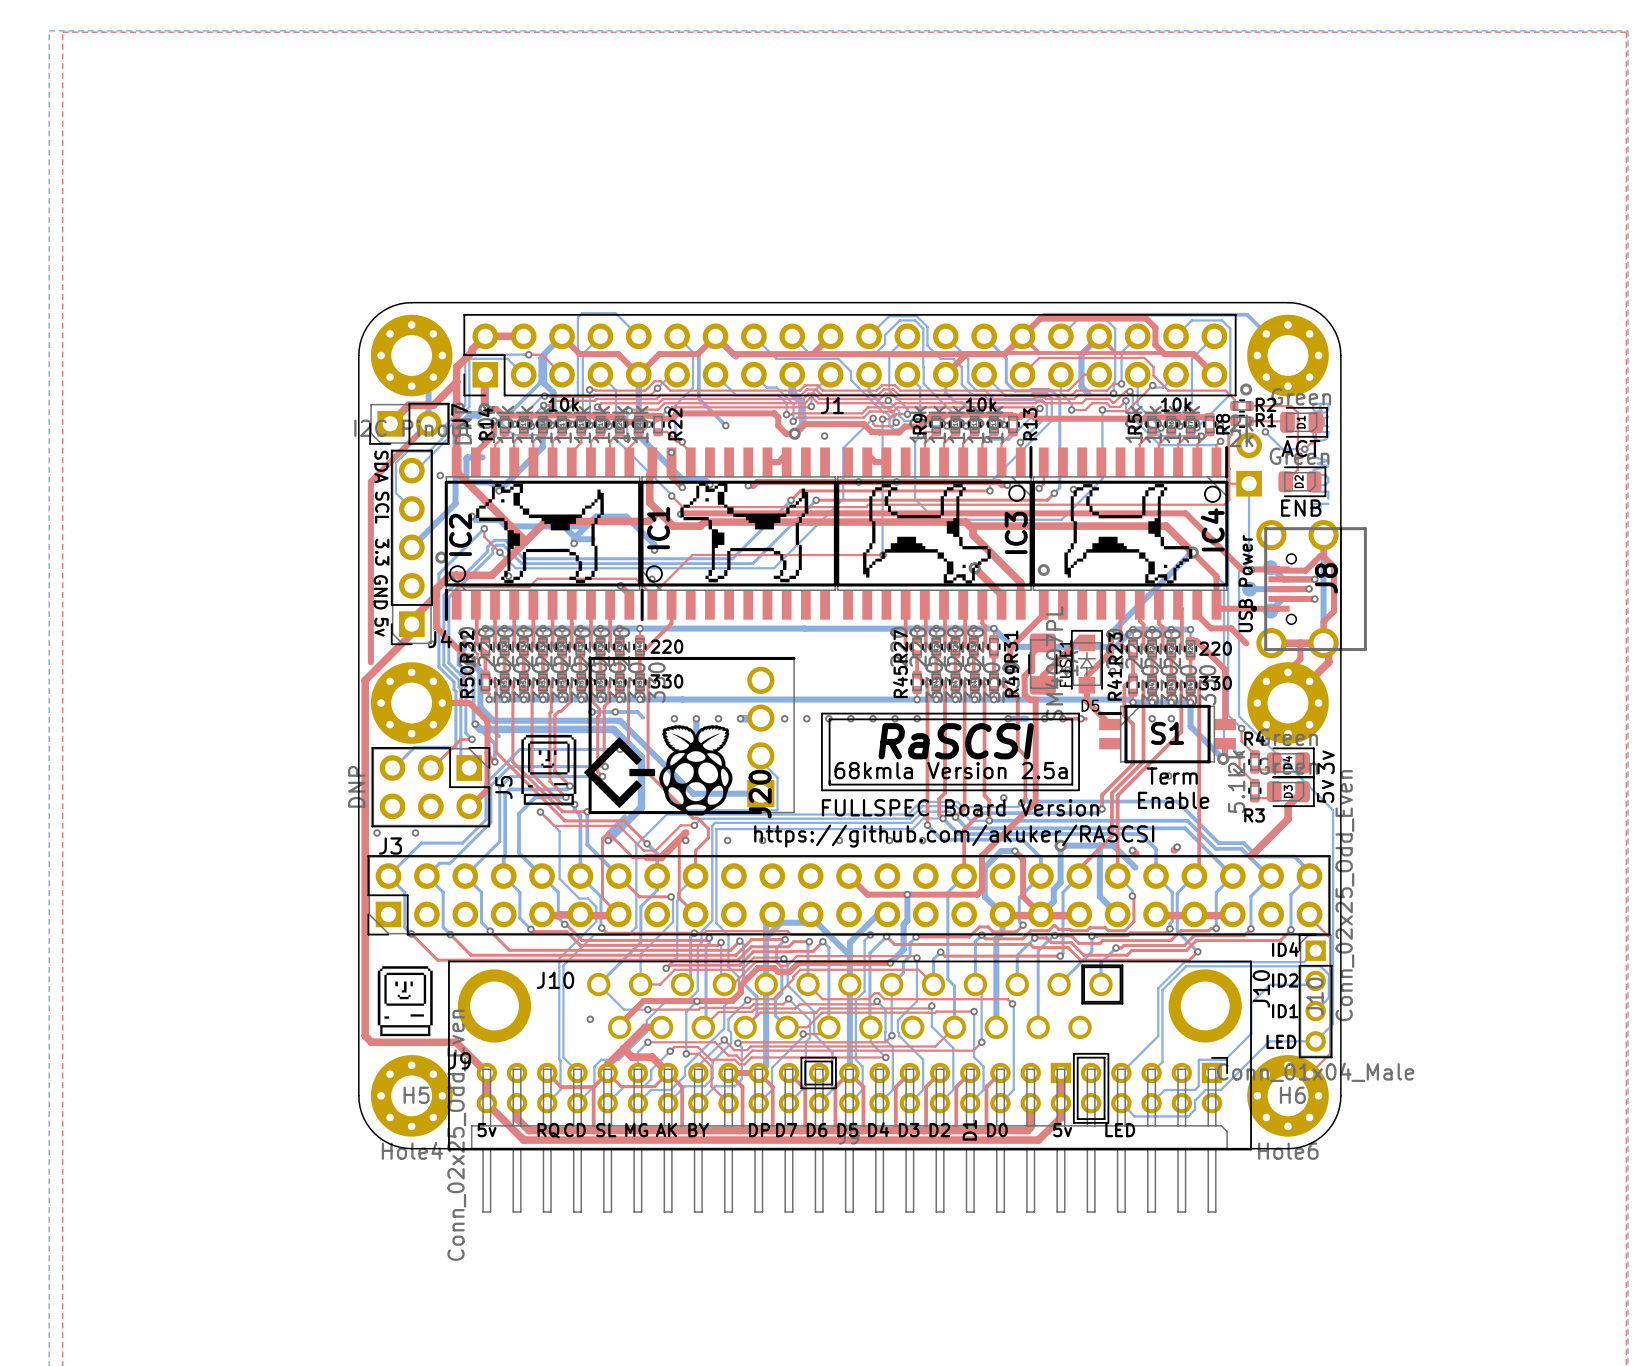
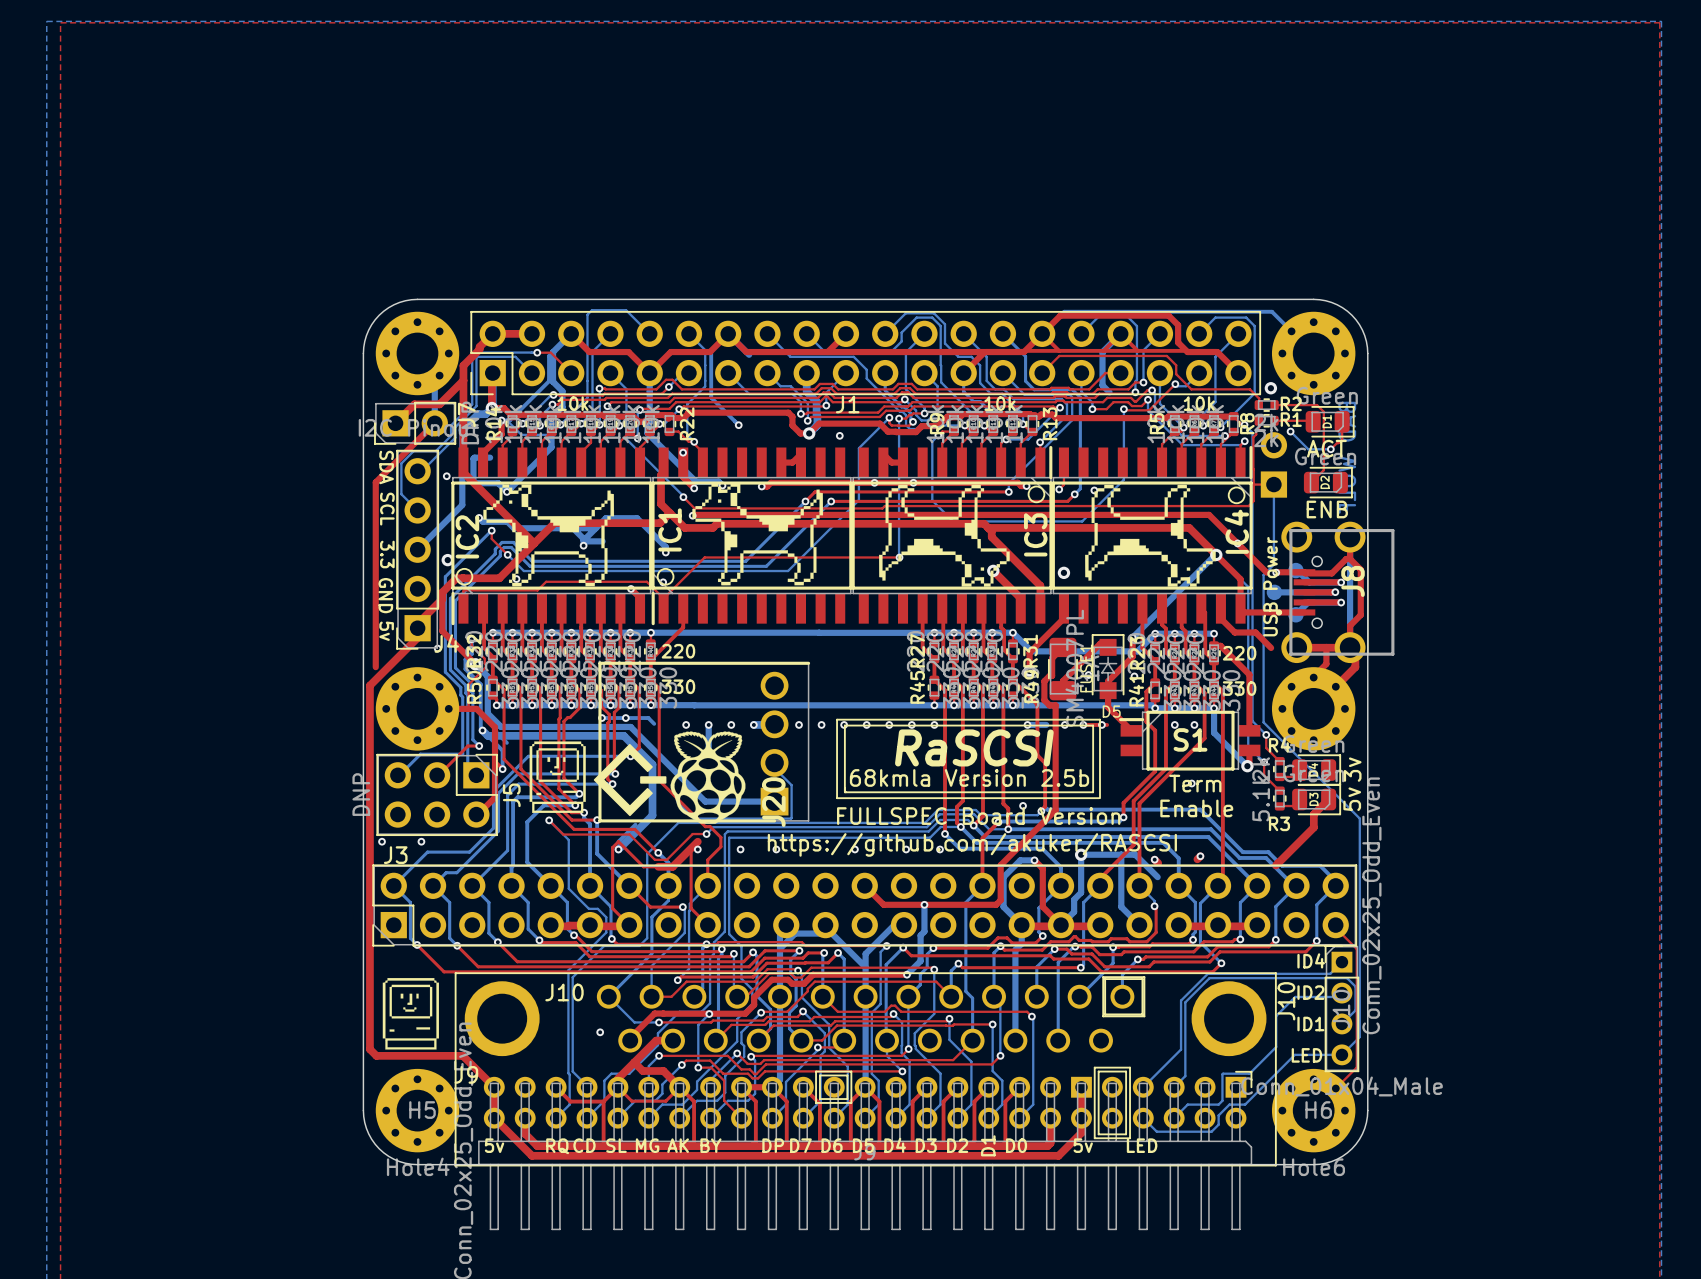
text: 68kmla Version 2.5a (951, 770) -> 68kmla Version 2.5b (969, 777)

